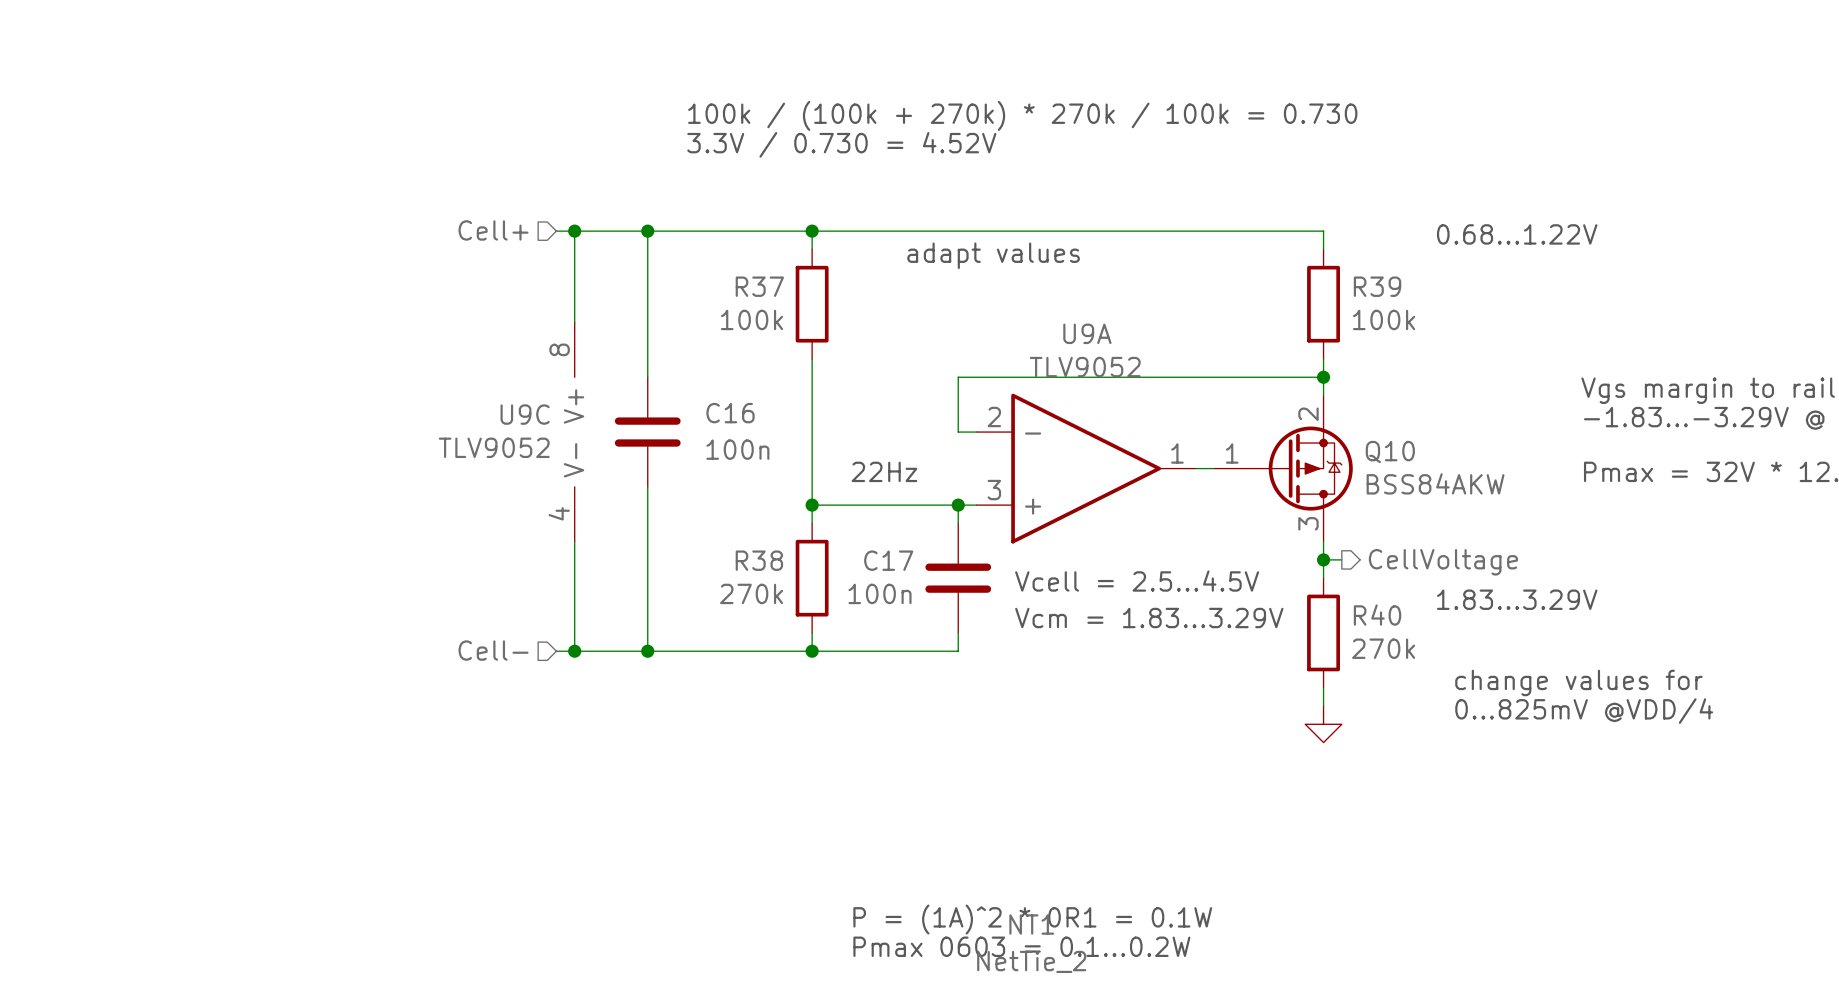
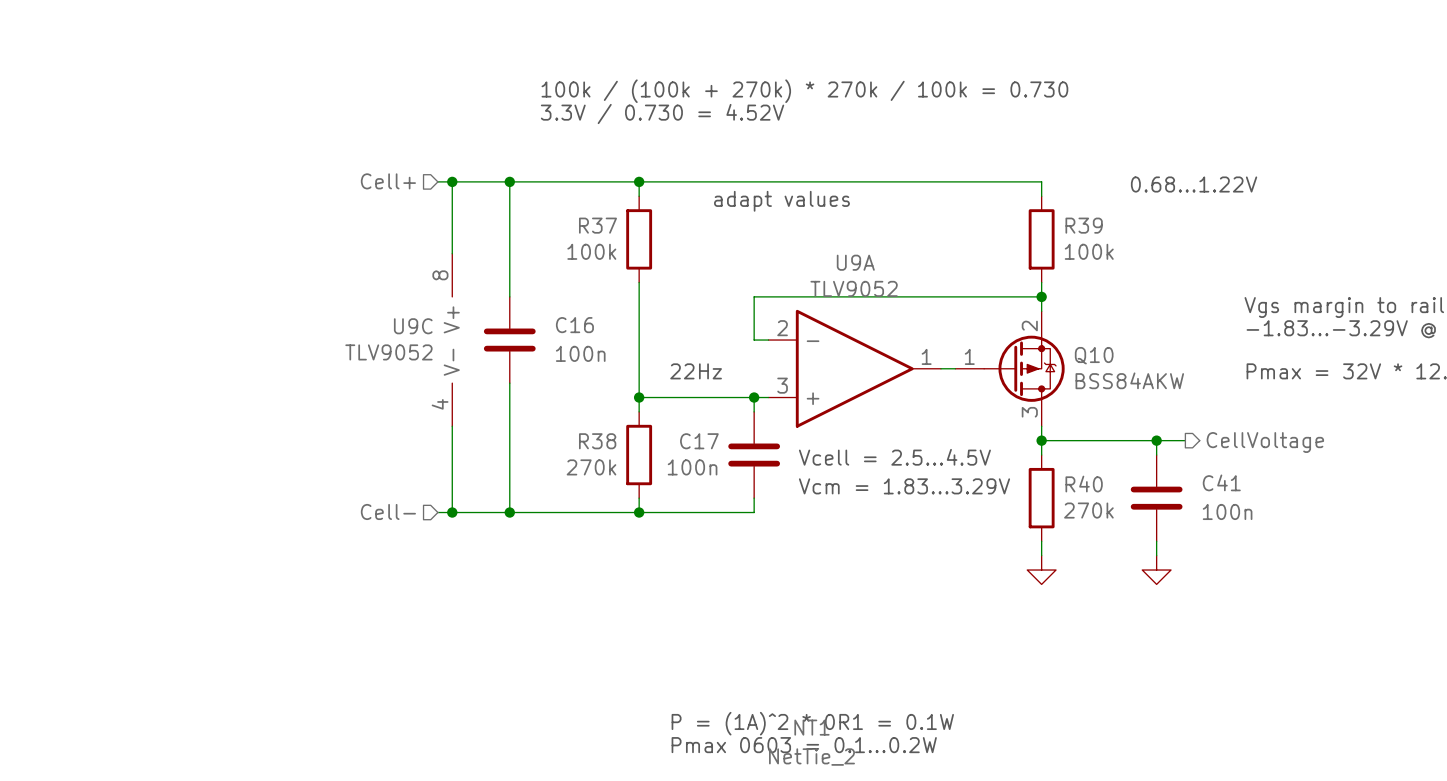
wire: none -> (1056, 440) (1185, 440)
wire: none -> (1156, 440) (1156, 455)
junction: none -> (1156, 440)
hierarchical label position: CellVoltage (1443, 562) -> CellVoltage (1265, 442)
text: 1.83...3.29V (1517, 599) -> none
C41: none -> 100n (1156, 498)
text: change values for (1578, 682) -> none
wire: none -> (1156, 541) (1156, 555)
text: 0...825mV @VDD/4 (1584, 711) -> none
power symbol: none -> (1156, 570)

